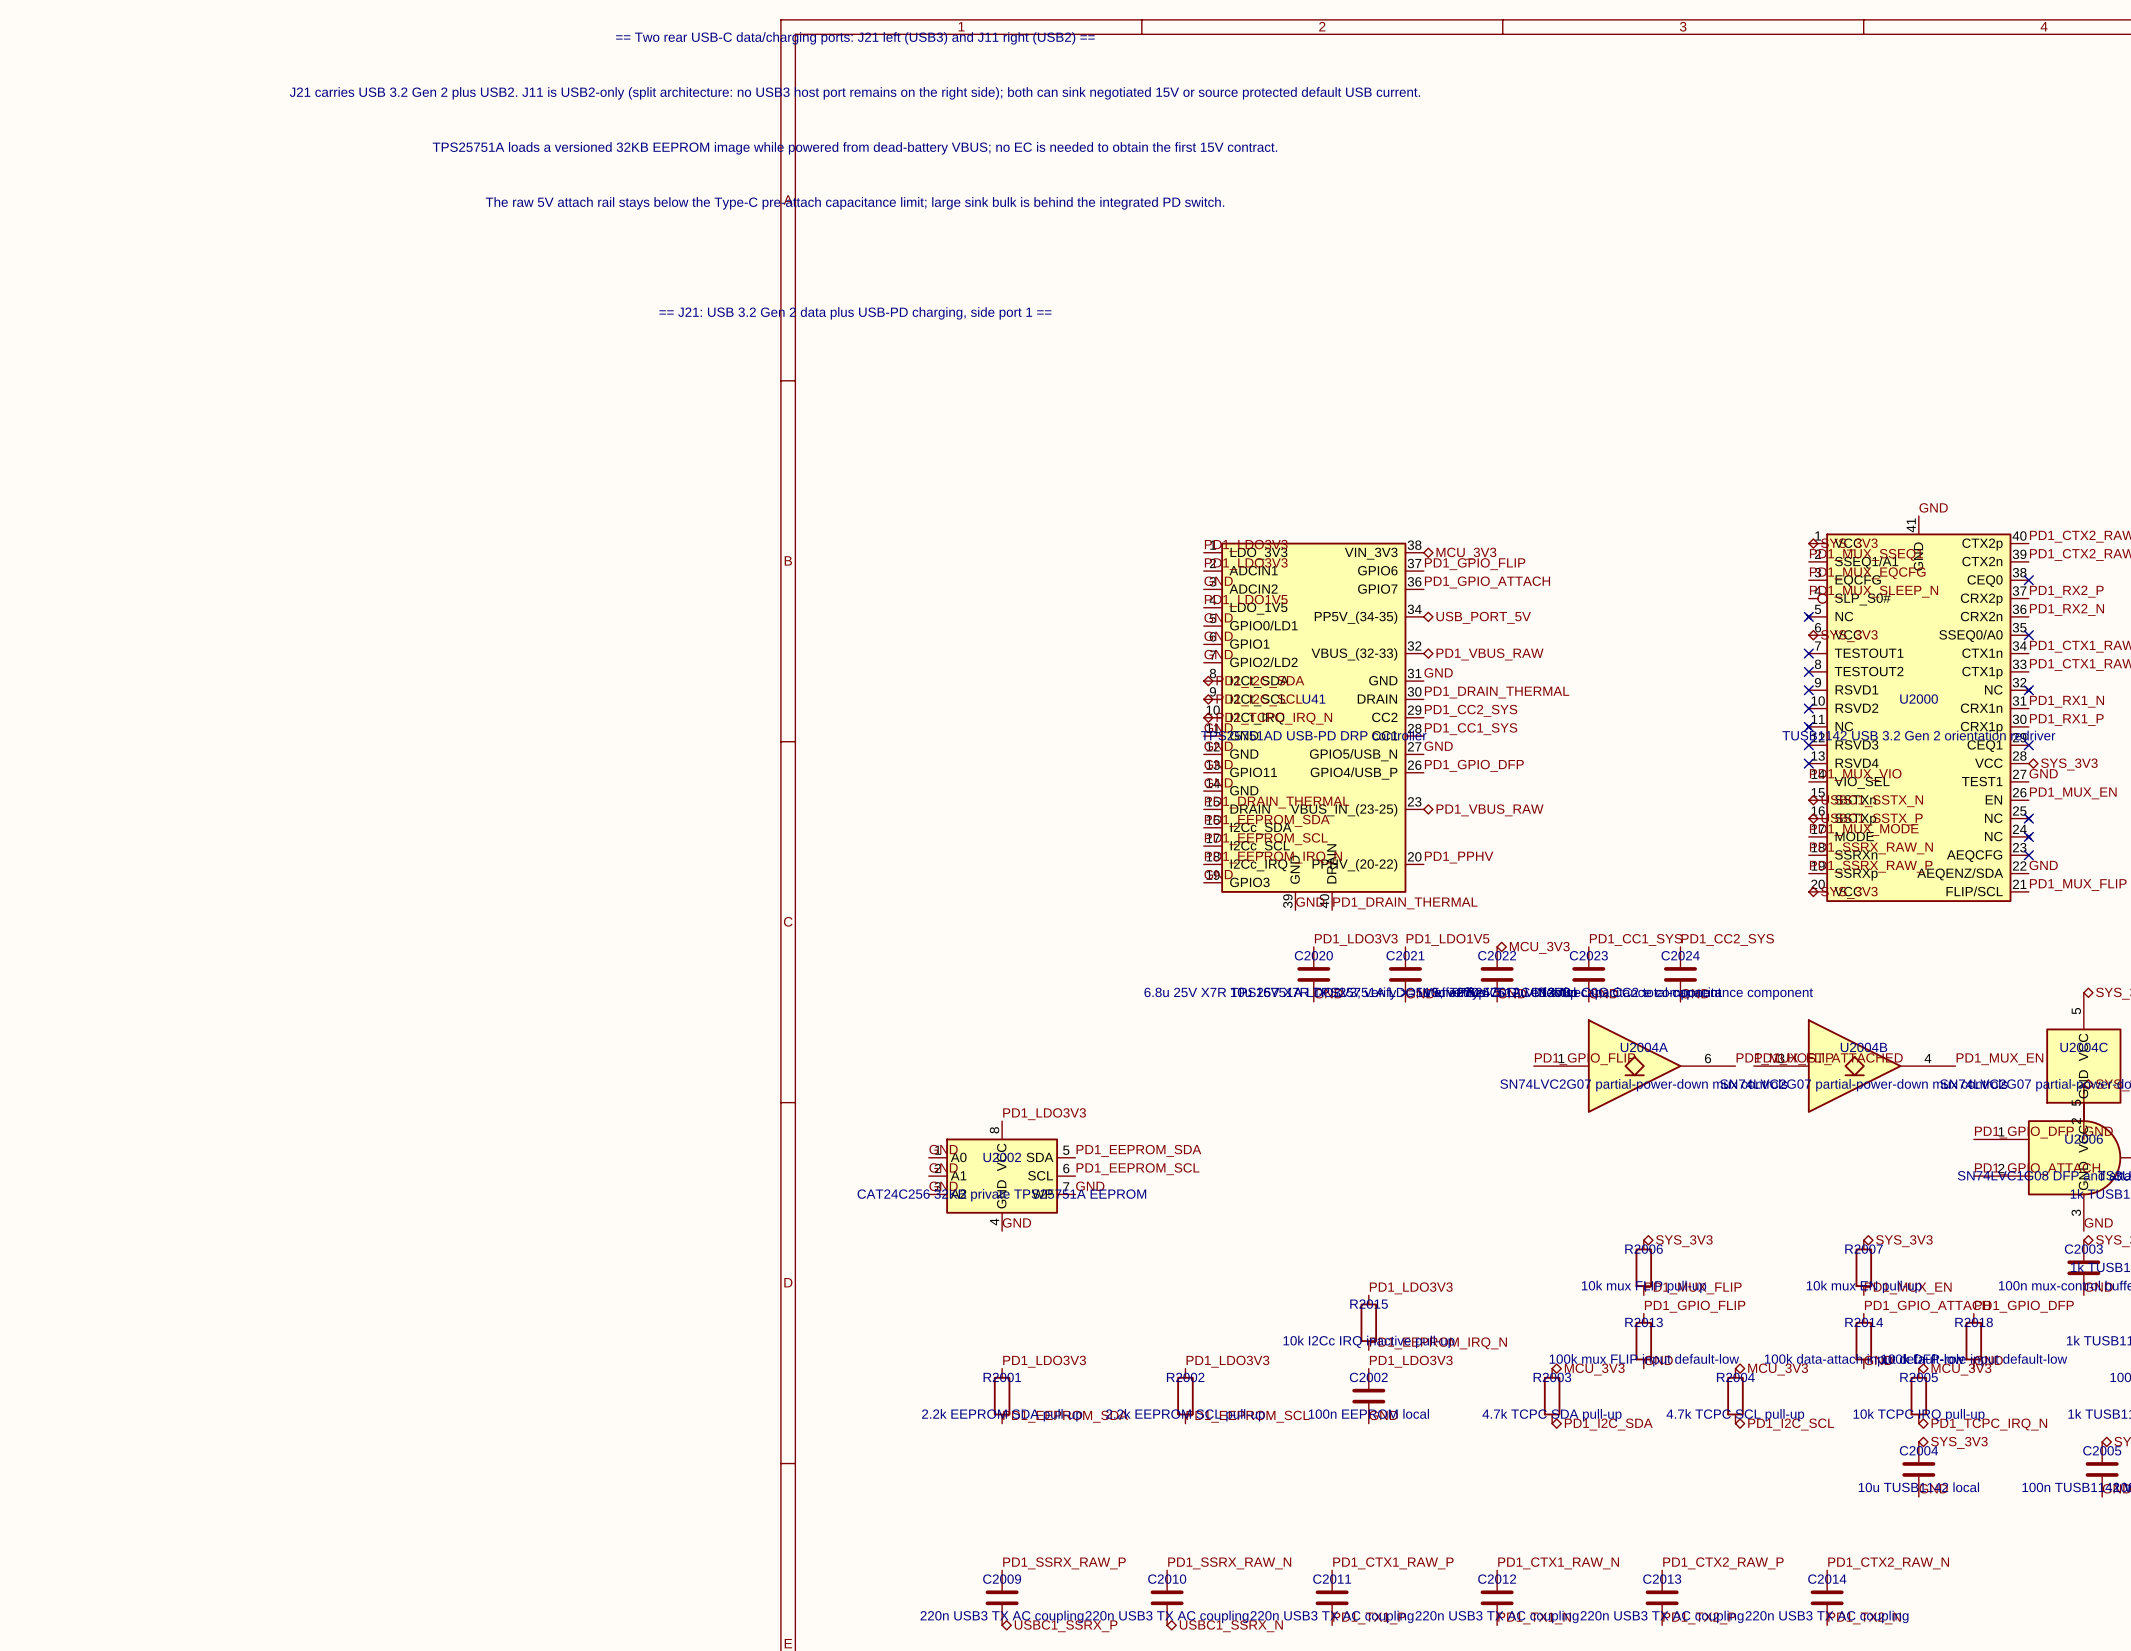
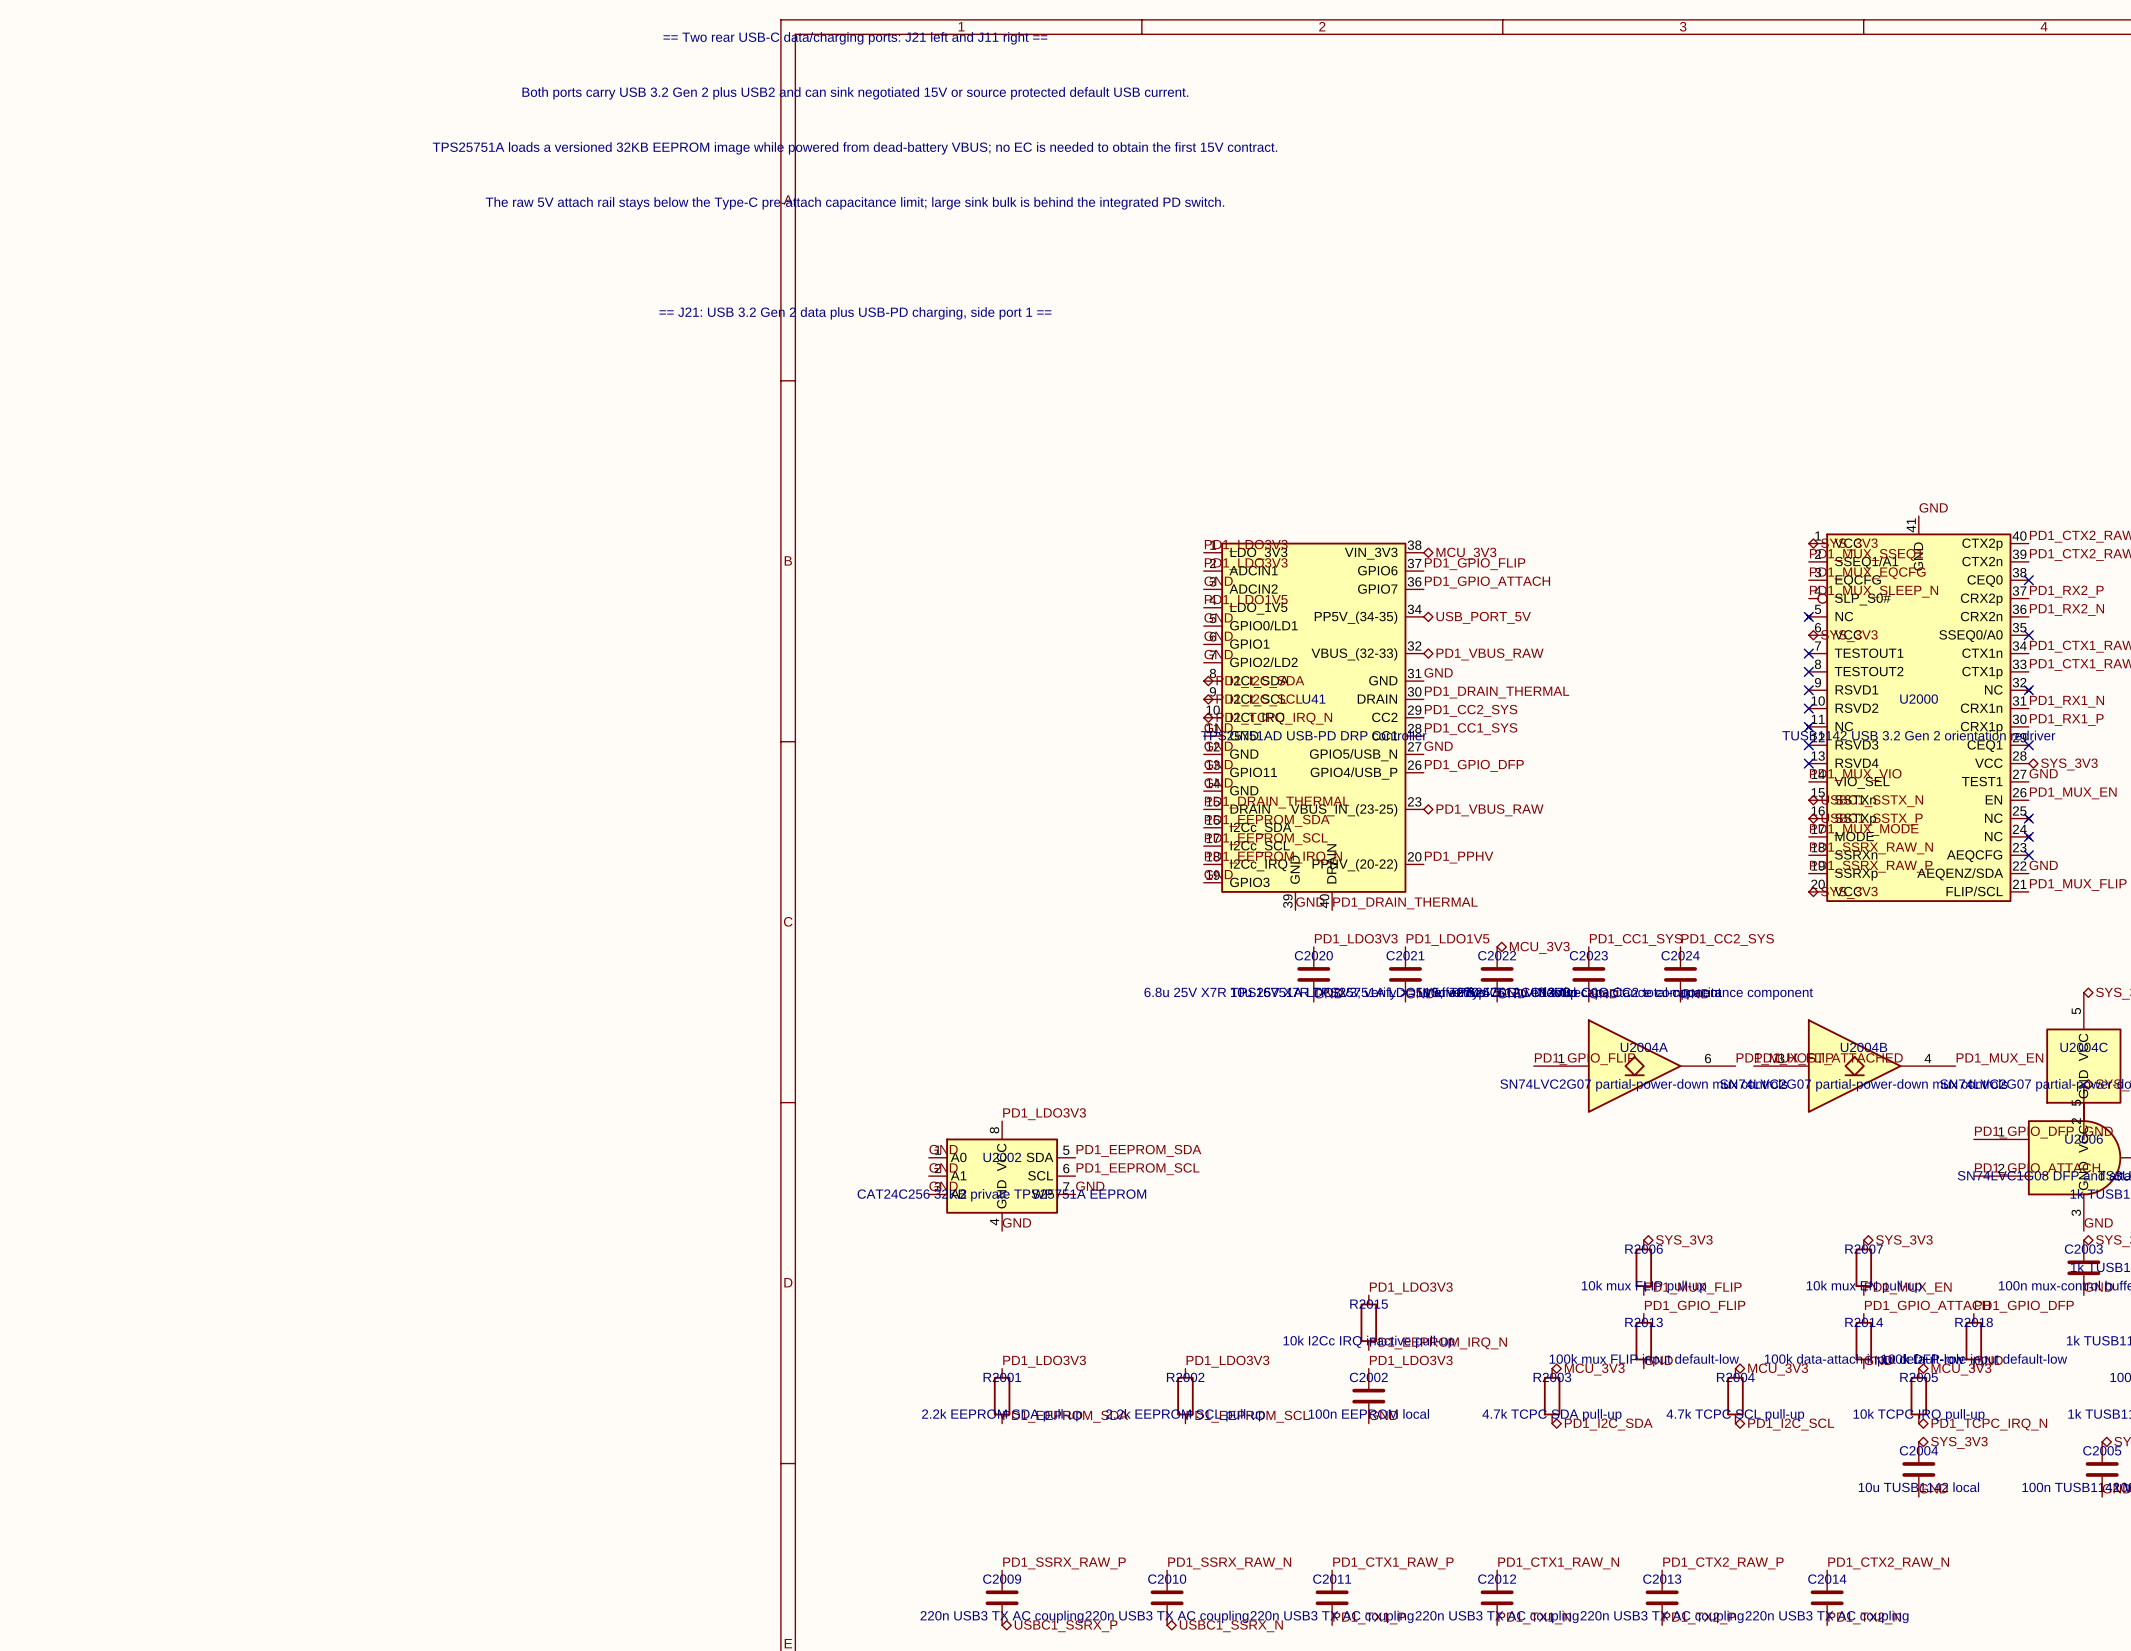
text: == Two rear USB-C data/charging ports: J21 left (USB3) and J11 right (USB2) == (855, 38) -> == Two rear USB-C data/charging ports: J21 left and J11 right == (855, 38)
text: J21 carries USB 3.2 Gen 2 plus USB2. J11 is USB2-only (split architecture: no USB3 host port remains on the right side); both can sink negotiated 15V or source protected default USB current. (854, 93) -> Both ports carry USB 3.2 Gen 2 plus USB2 and can sink negotiated 15V or source protected default USB current. (855, 93)

